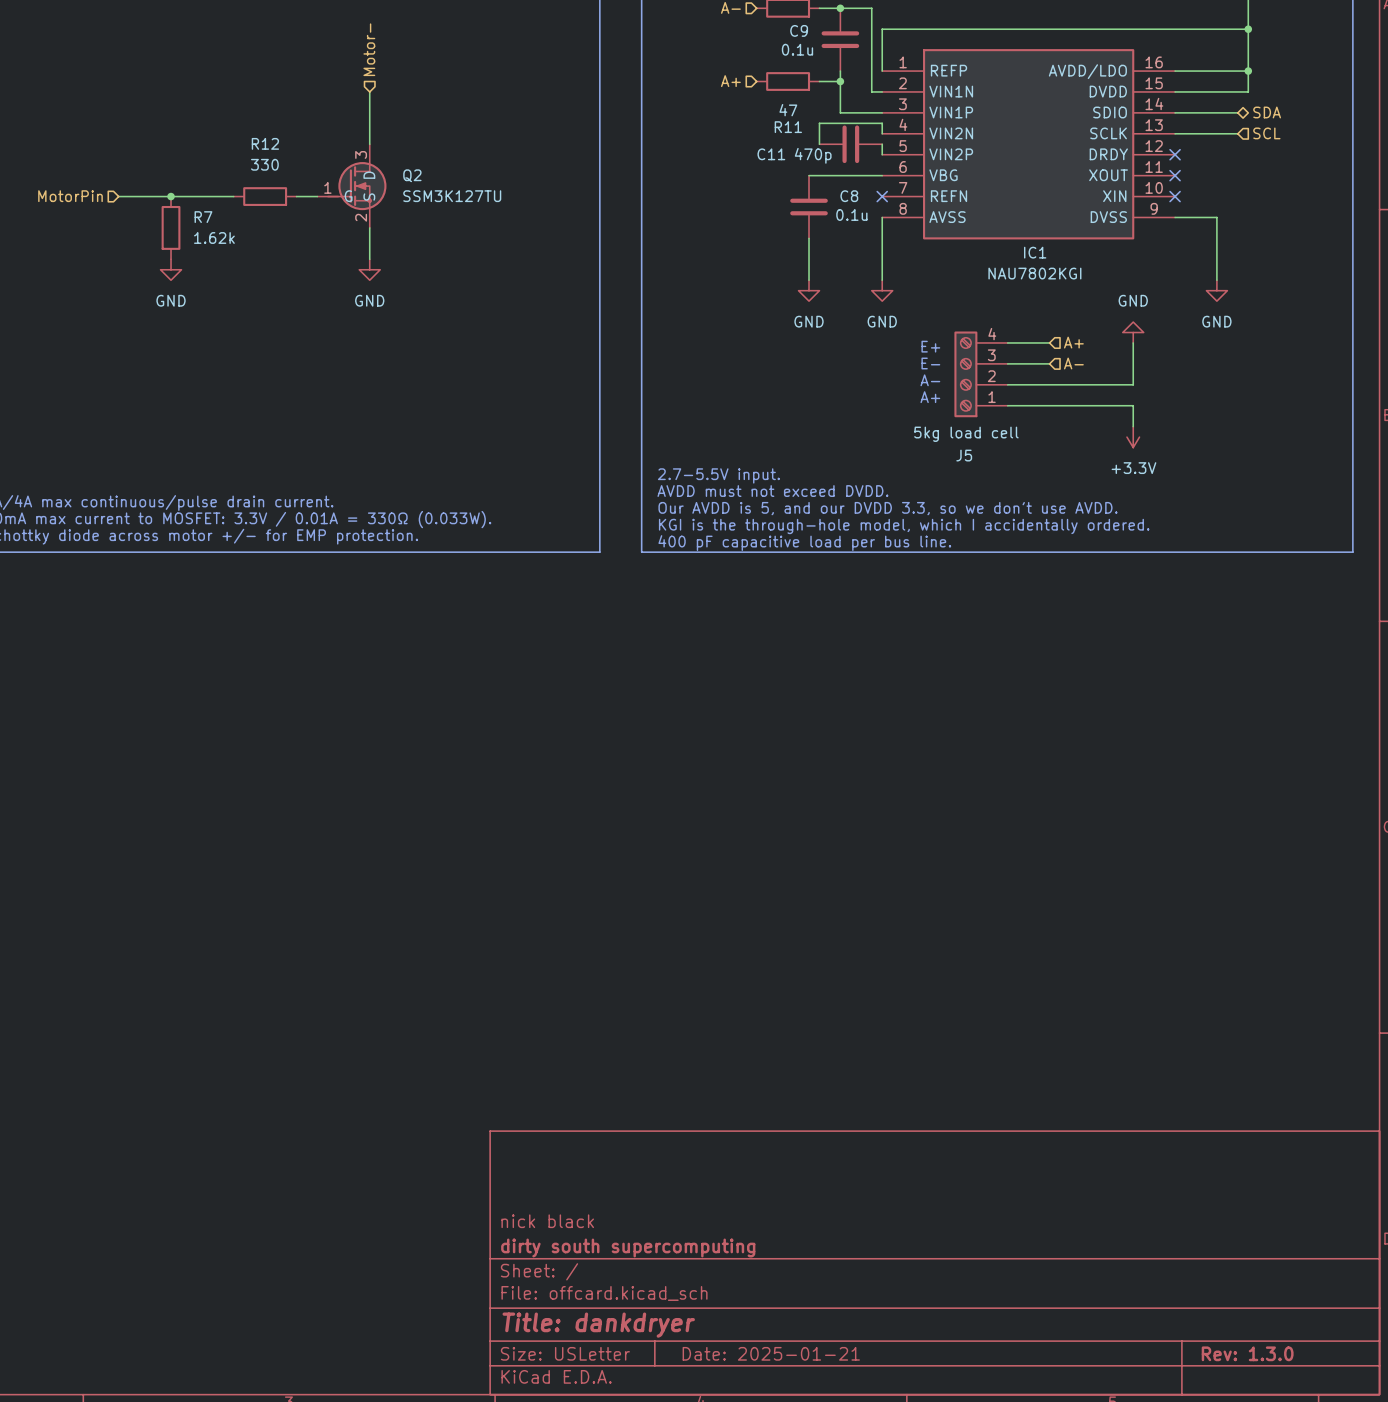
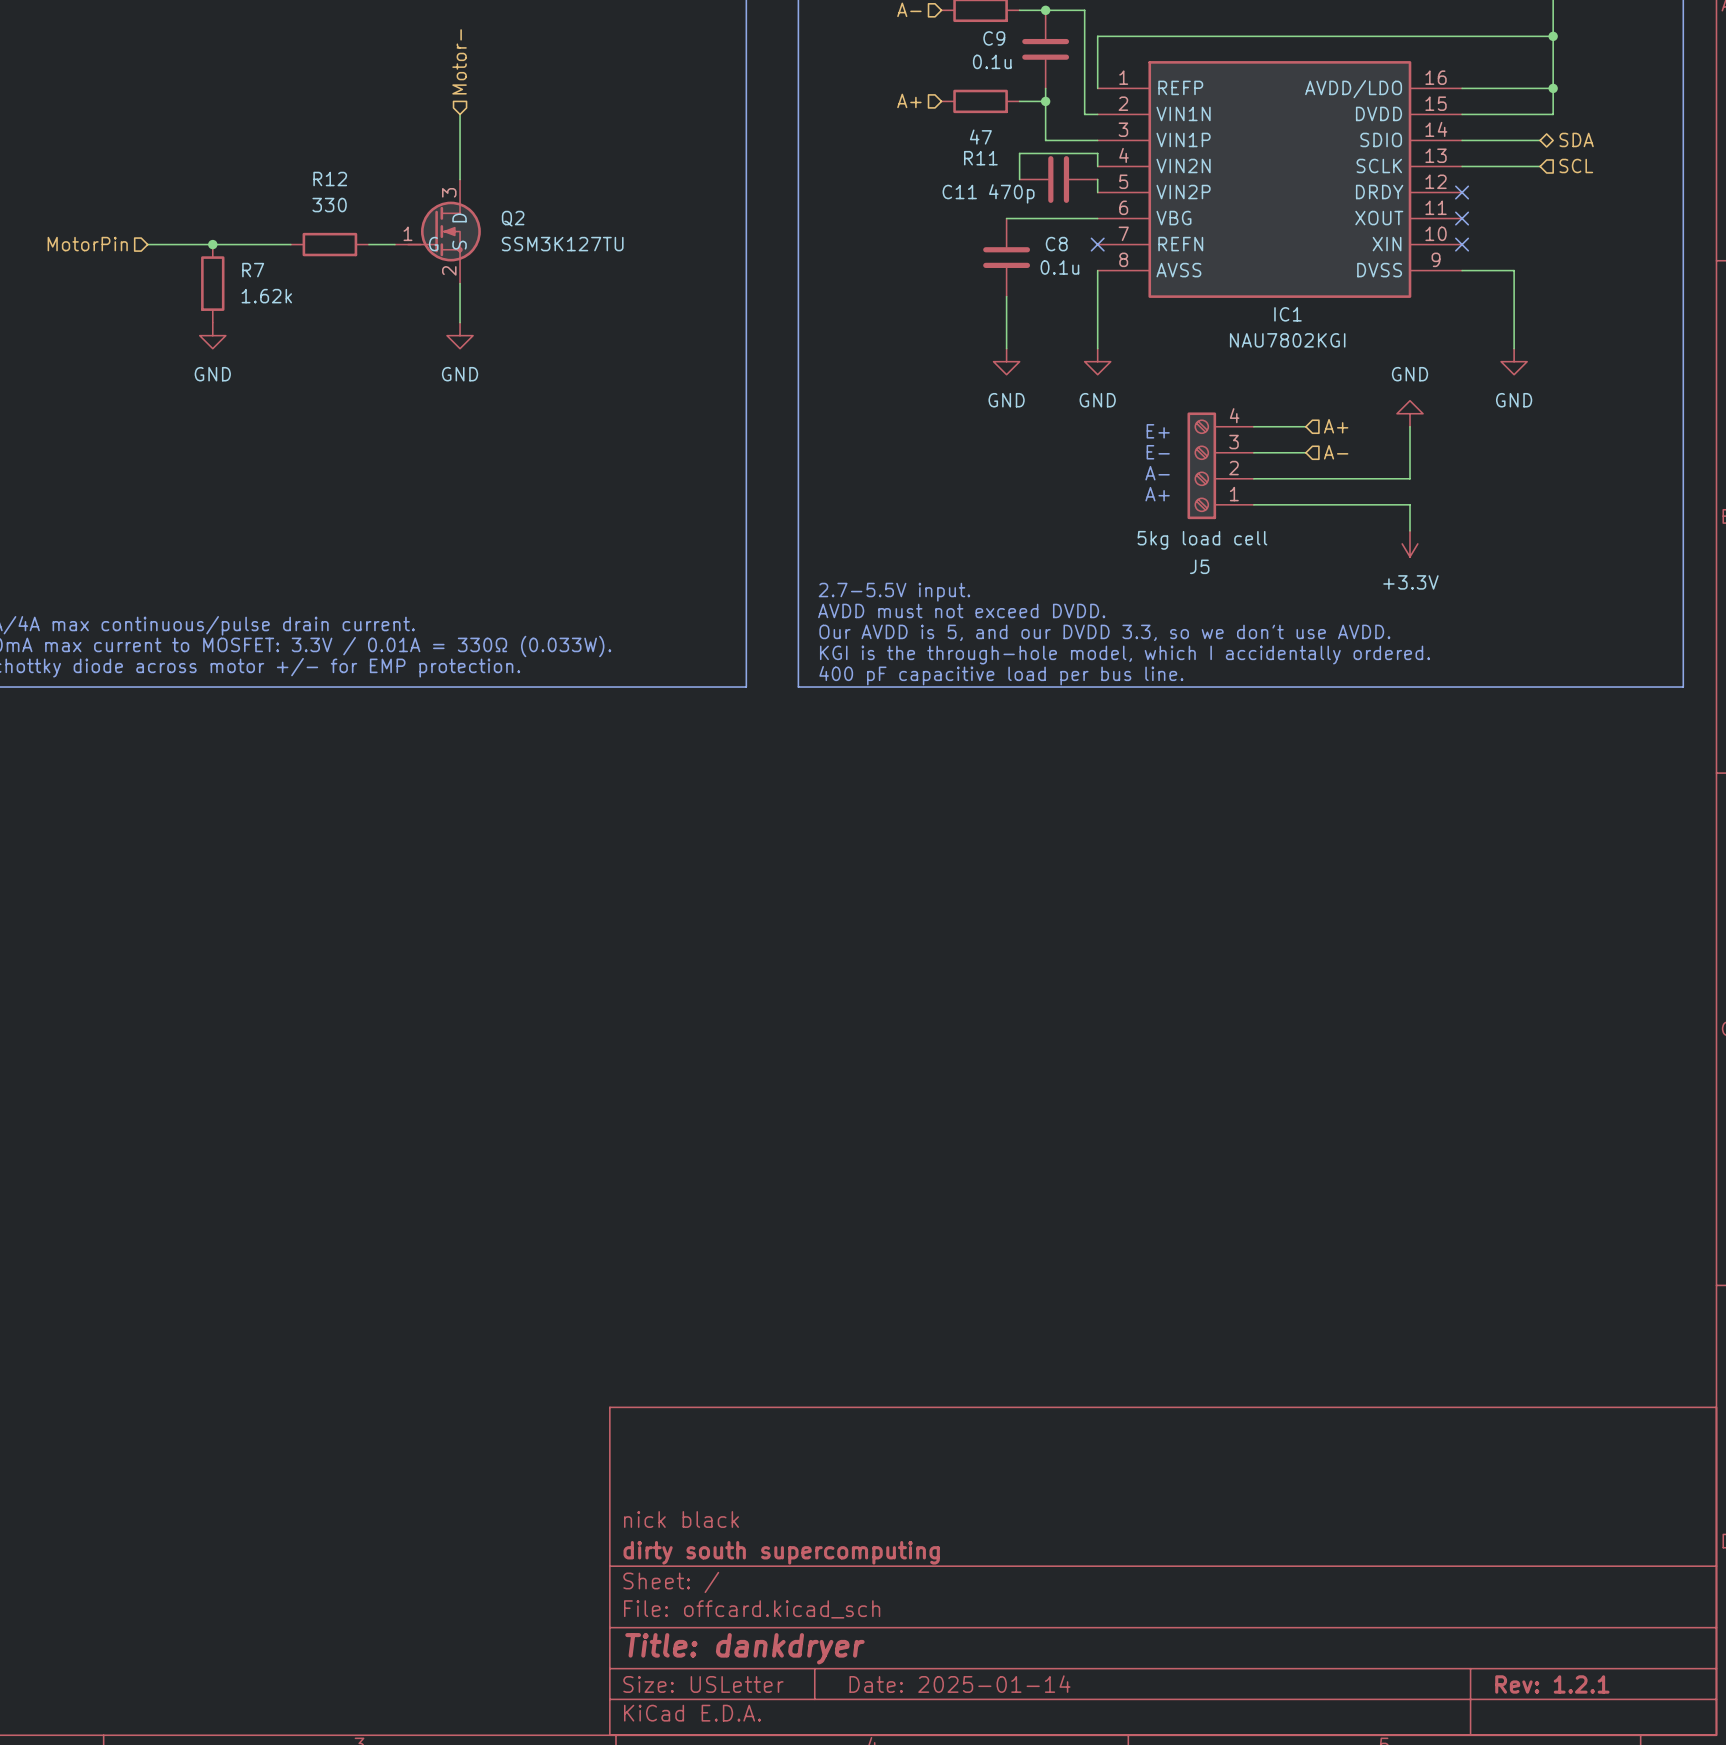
title block: Date: 2025-01-21 (771, 1353) -> Date: 2025-01-14 (959, 1684)
title block: Rev: 1.3.0 (1247, 1353) -> Rev: 1.2.1 (1552, 1684)

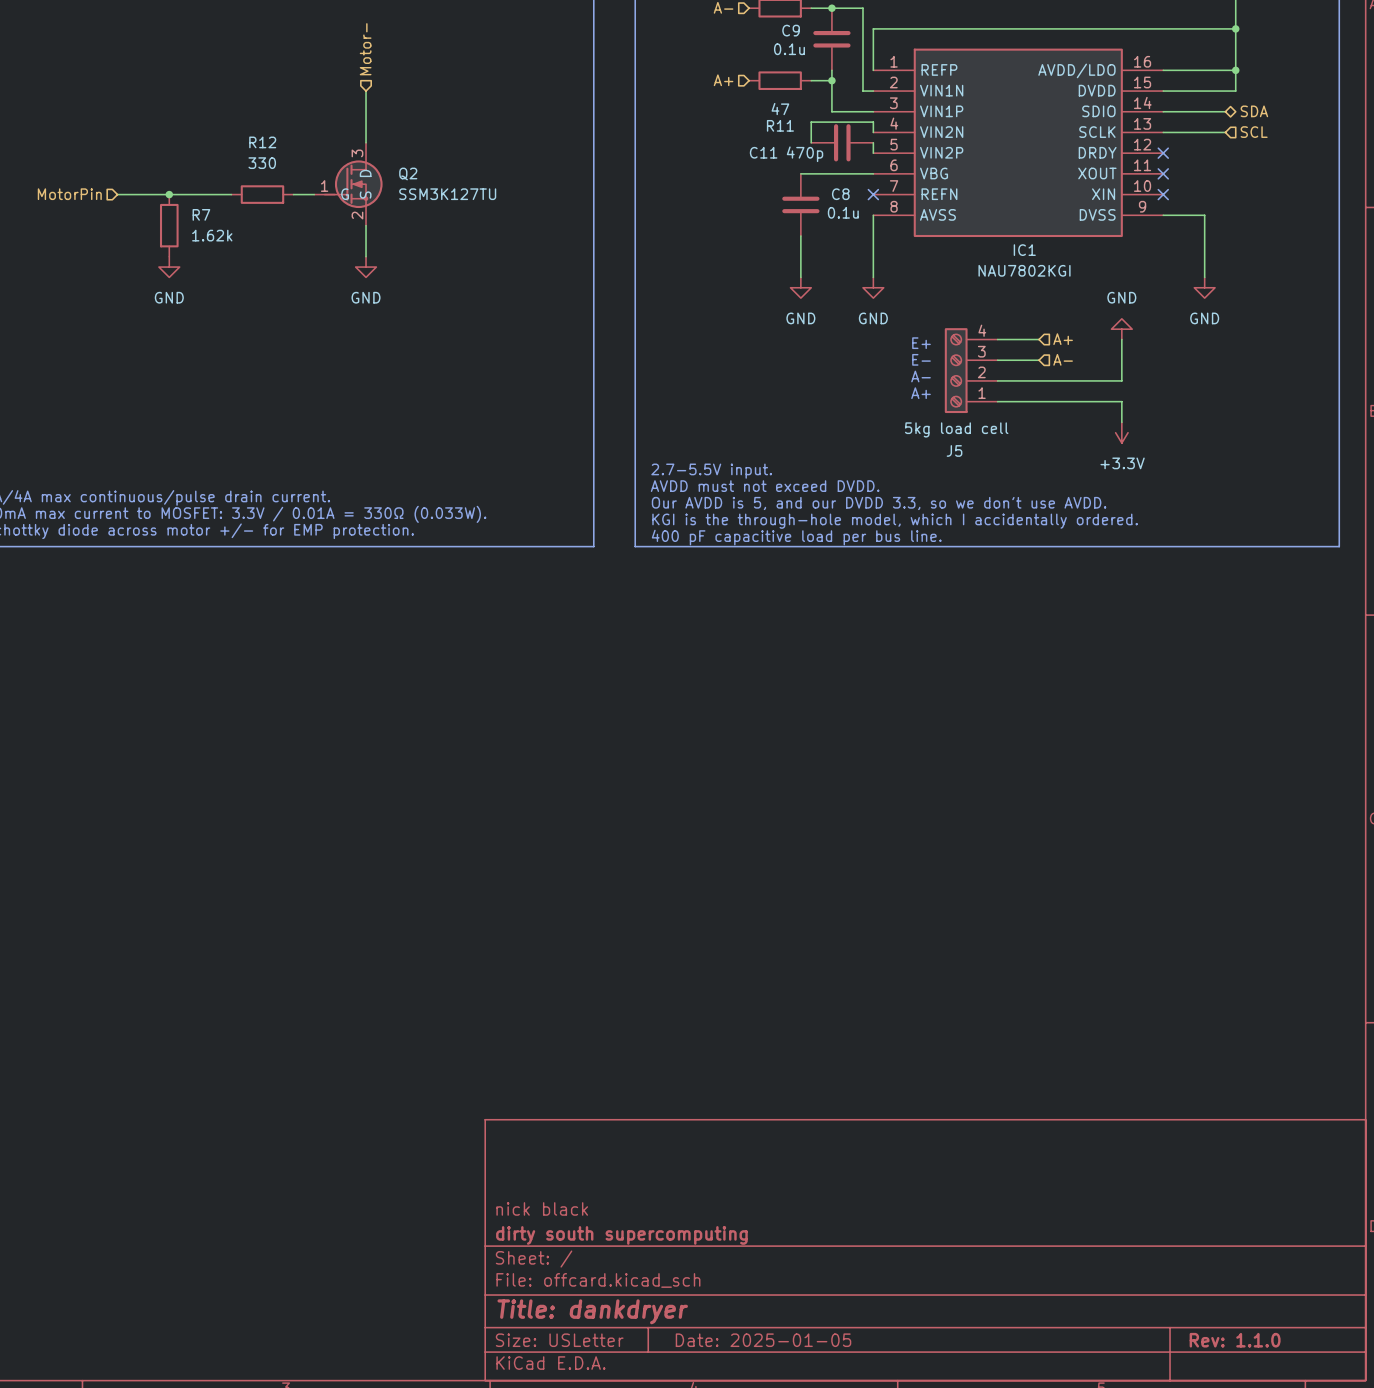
title block: Date: 2025-01-14 (959, 1684) -> Date: 2025-01-05 (763, 1340)
title block: Rev: 1.2.1 (1552, 1684) -> Rev: 1.1.0 (1235, 1340)

